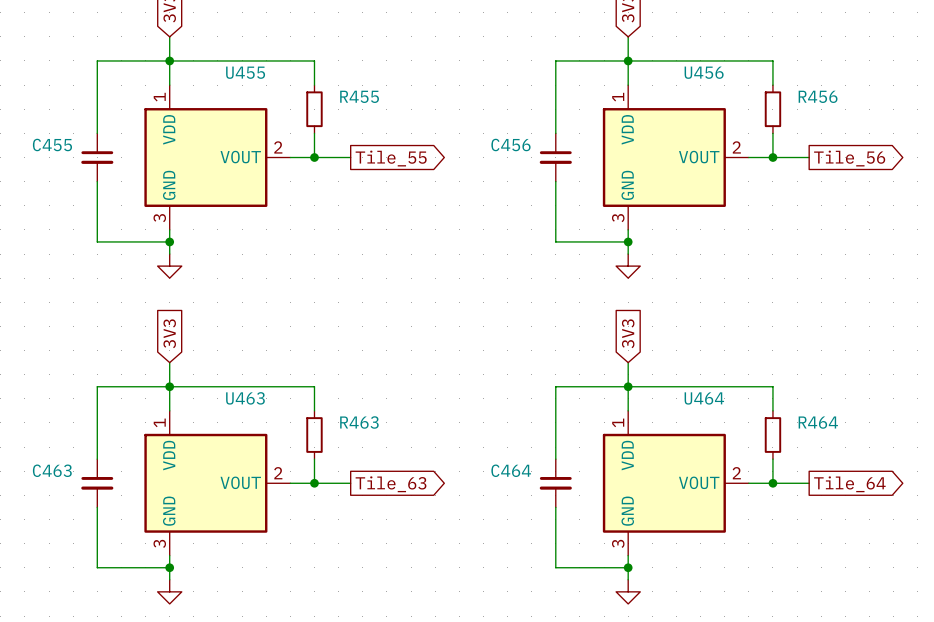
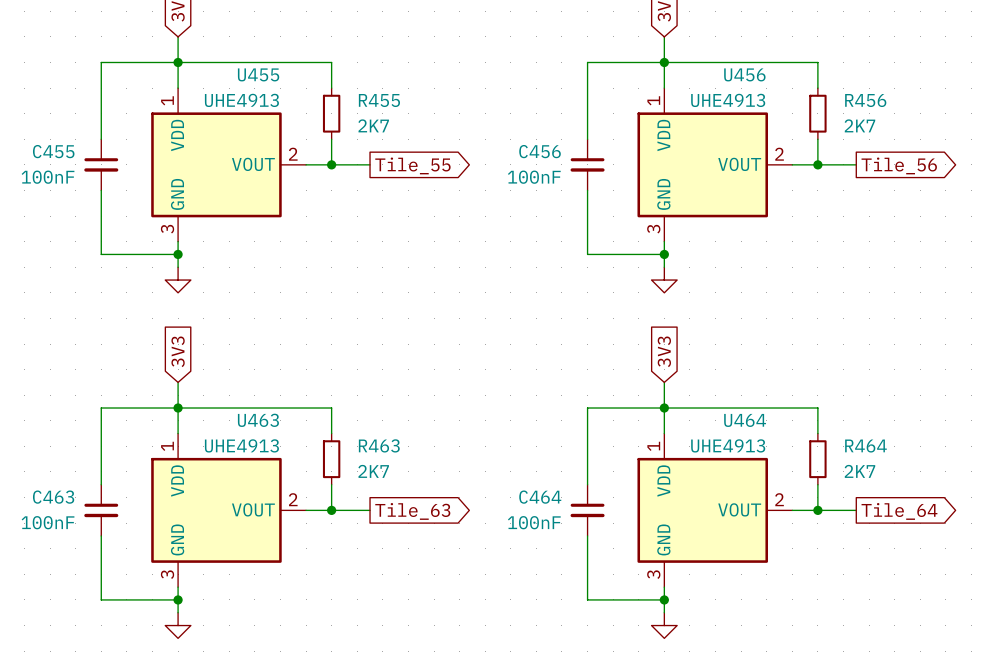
U455 value: none -> UHE4913 (241, 100)
U456 value: none -> UHE4913 (728, 100)
R455 value: none -> 2K7 (373, 125)
R456 value: none -> 2K7 (859, 125)
C455 value: none -> 100nF (48, 177)
C456 value: none -> 100nF (534, 177)
U463 value: none -> UHE4913 (241, 445)
U464 value: none -> UHE4913 (728, 445)
R463 value: none -> 2K7 (373, 471)
R464 value: none -> 2K7 (859, 471)
C463 value: none -> 100nF (48, 522)
C464 value: none -> 100nF (534, 522)

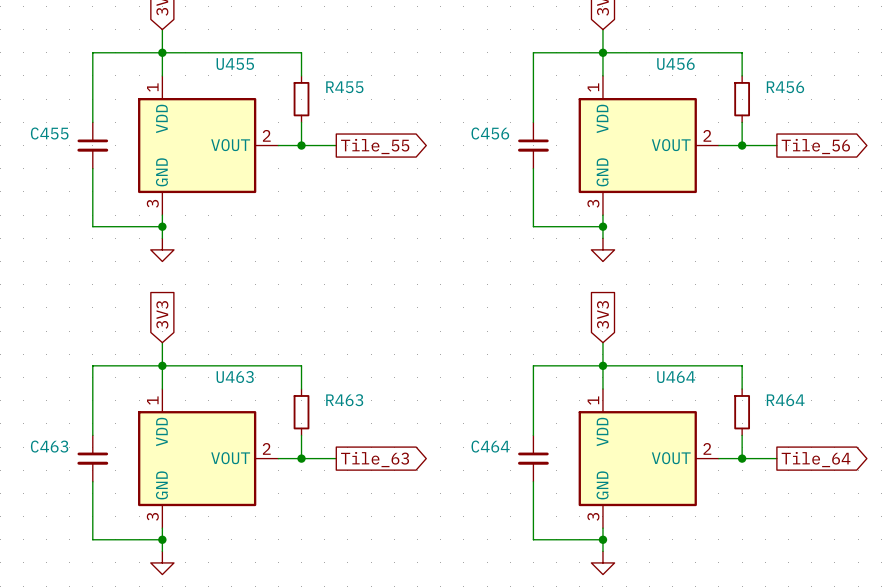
U455 value: UHE4913 (241, 100) -> none
U456 value: UHE4913 (728, 100) -> none
R455 value: 2K7 (373, 125) -> none
R456 value: 2K7 (859, 125) -> none
C455 value: 100nF (48, 177) -> none
C456 value: 100nF (534, 177) -> none
U463 value: UHE4913 (241, 445) -> none
U464 value: UHE4913 (728, 445) -> none
R463 value: 2K7 (373, 471) -> none
R464 value: 2K7 (859, 471) -> none
C463 value: 100nF (48, 522) -> none
C464 value: 100nF (534, 522) -> none

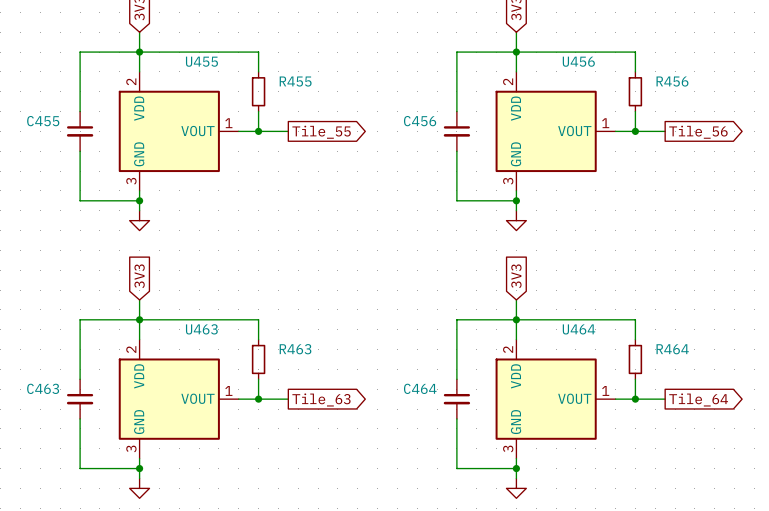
U455 pin number: 1 (152, 87) -> 2 (131, 81)
U456 pin number: 1 (593, 87) -> 2 (508, 81)
U455 pin number: 2 (266, 135) -> 1 (228, 123)
U456 pin number: 2 (707, 135) -> 1 (605, 123)
U463 pin number: 1 (152, 400) -> 2 (131, 349)
U464 pin number: 1 (593, 400) -> 2 (508, 349)
U463 pin number: 2 (266, 448) -> 1 (228, 390)
U464 pin number: 2 (707, 448) -> 1 (605, 390)

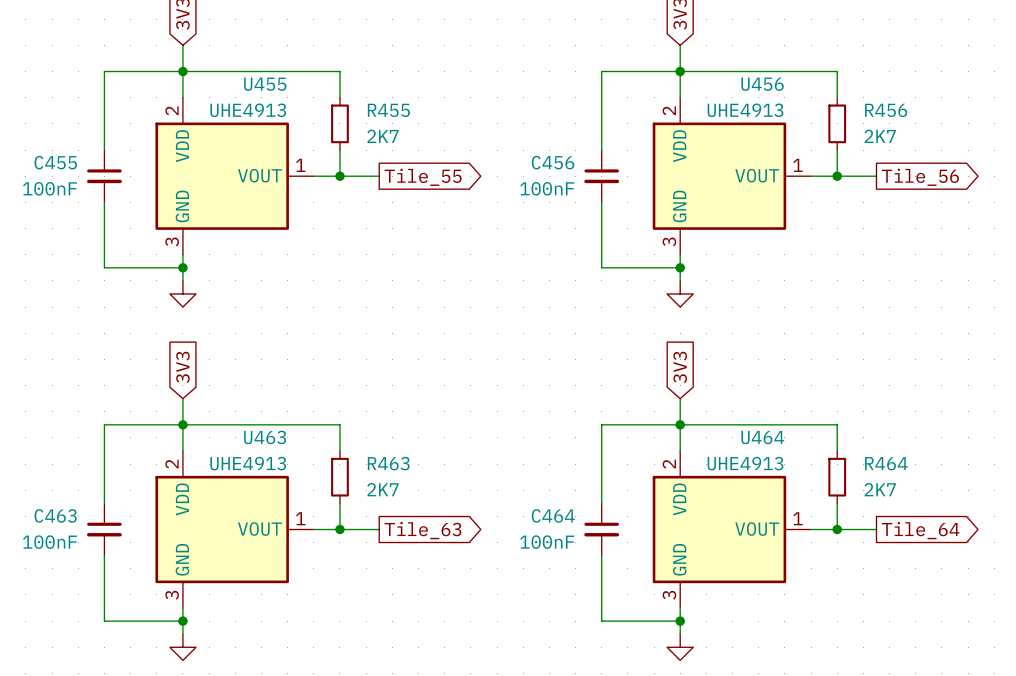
U455 value: none -> UHE4913 (248, 110)
U456 value: none -> UHE4913 (745, 110)
R455 value: none -> 2K7 (382, 136)
R456 value: none -> 2K7 (880, 136)
C455 value: none -> 100nF (49, 188)
C456 value: none -> 100nF (547, 188)
U463 value: none -> UHE4913 (248, 463)
U464 value: none -> UHE4913 (745, 463)
R463 value: none -> 2K7 (382, 489)
R464 value: none -> 2K7 (880, 489)
C463 value: none -> 100nF (49, 542)
C464 value: none -> 100nF (547, 542)

